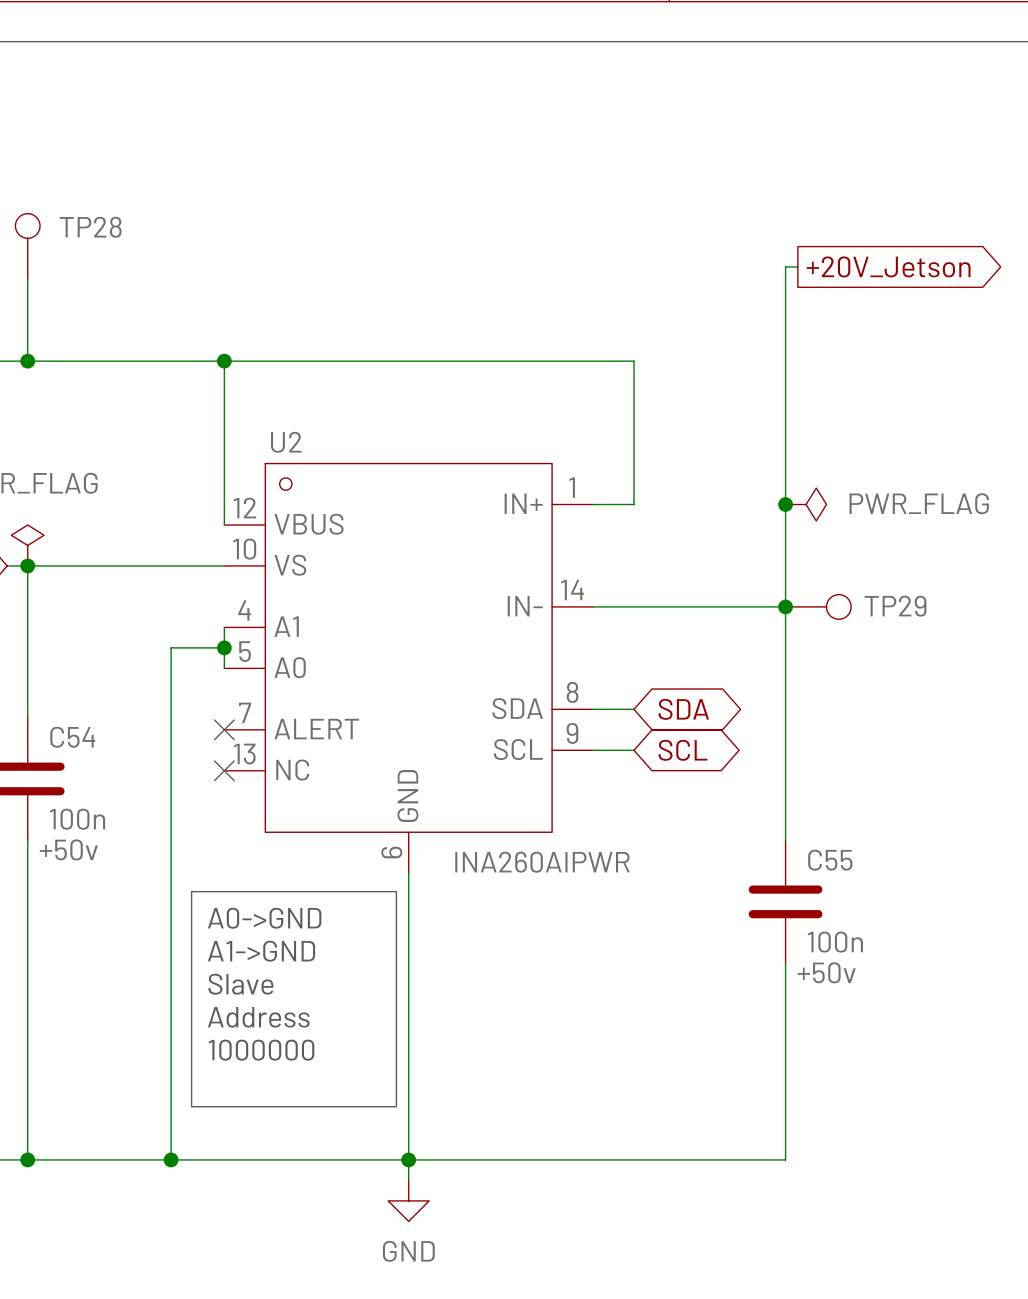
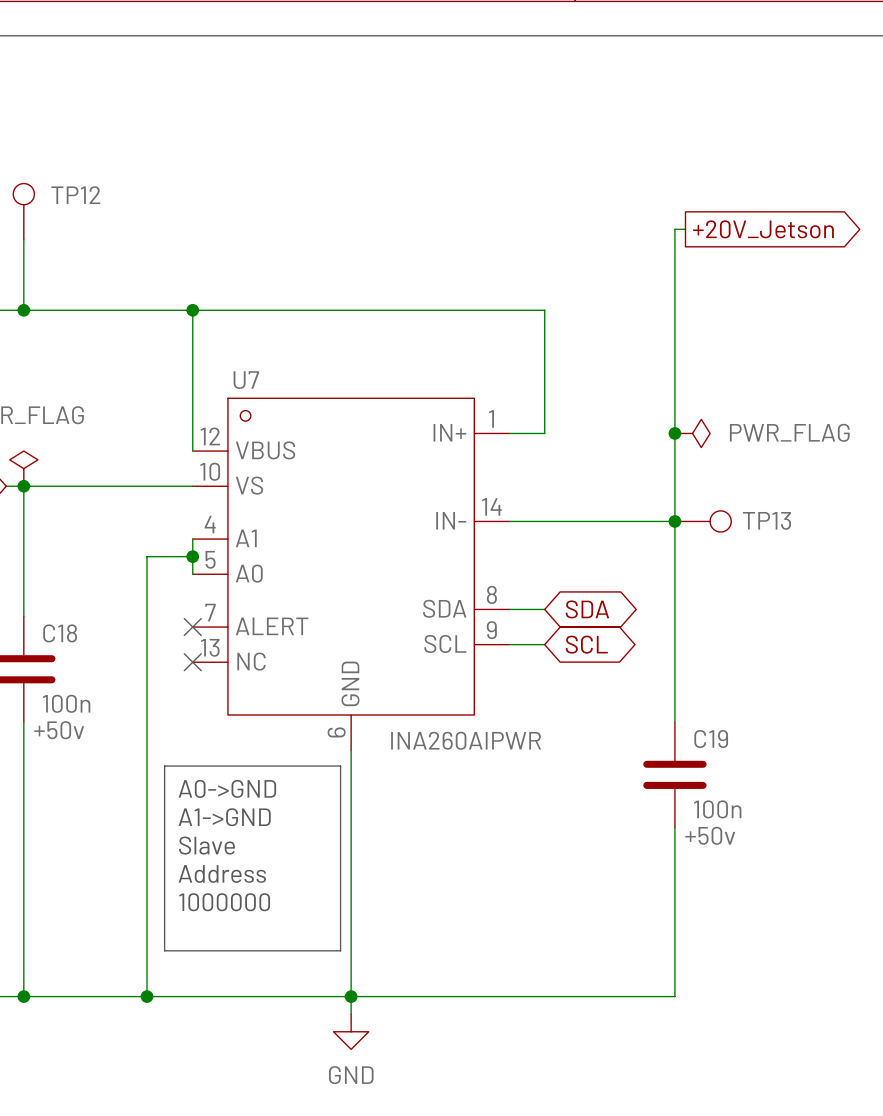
TP28 name: TP28 (90, 227) -> TP12 (75, 195)
U2 name: U2 (286, 442) -> U7 (246, 380)
TP29 name: TP29 (895, 606) -> TP13 (766, 520)
C54 name: C54 (72, 737) -> C18 (60, 633)
C55 name: C55 (830, 860) -> C19 (711, 739)

